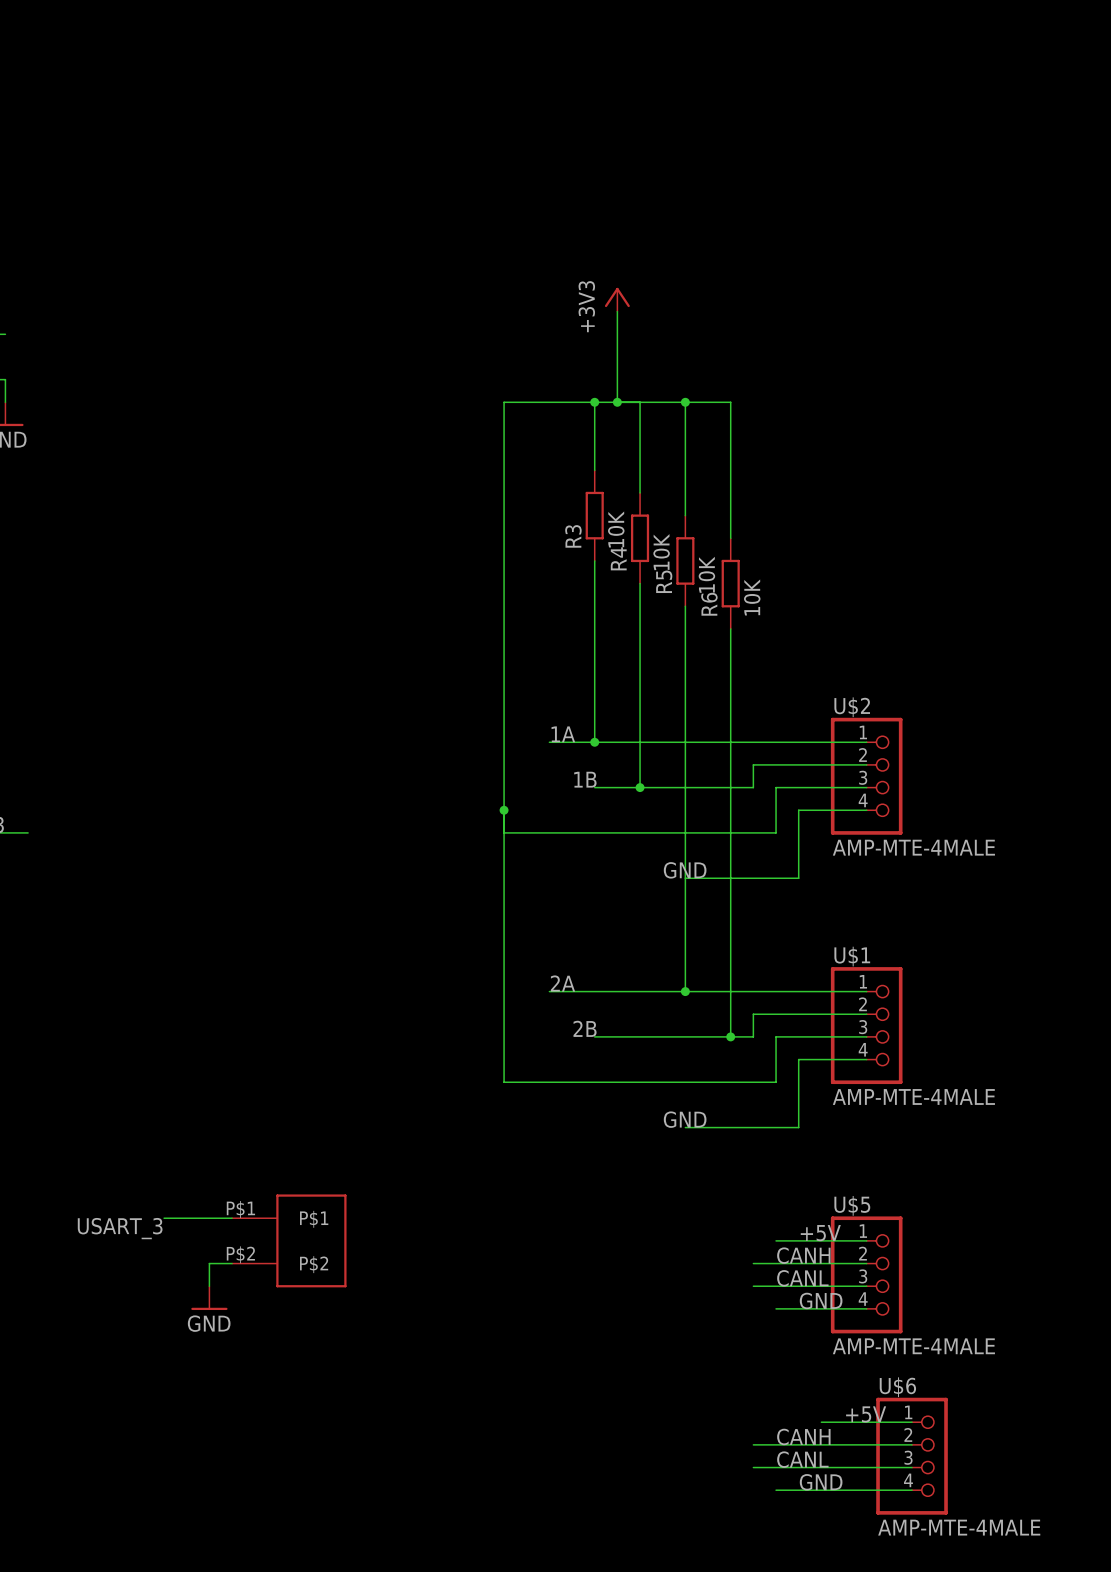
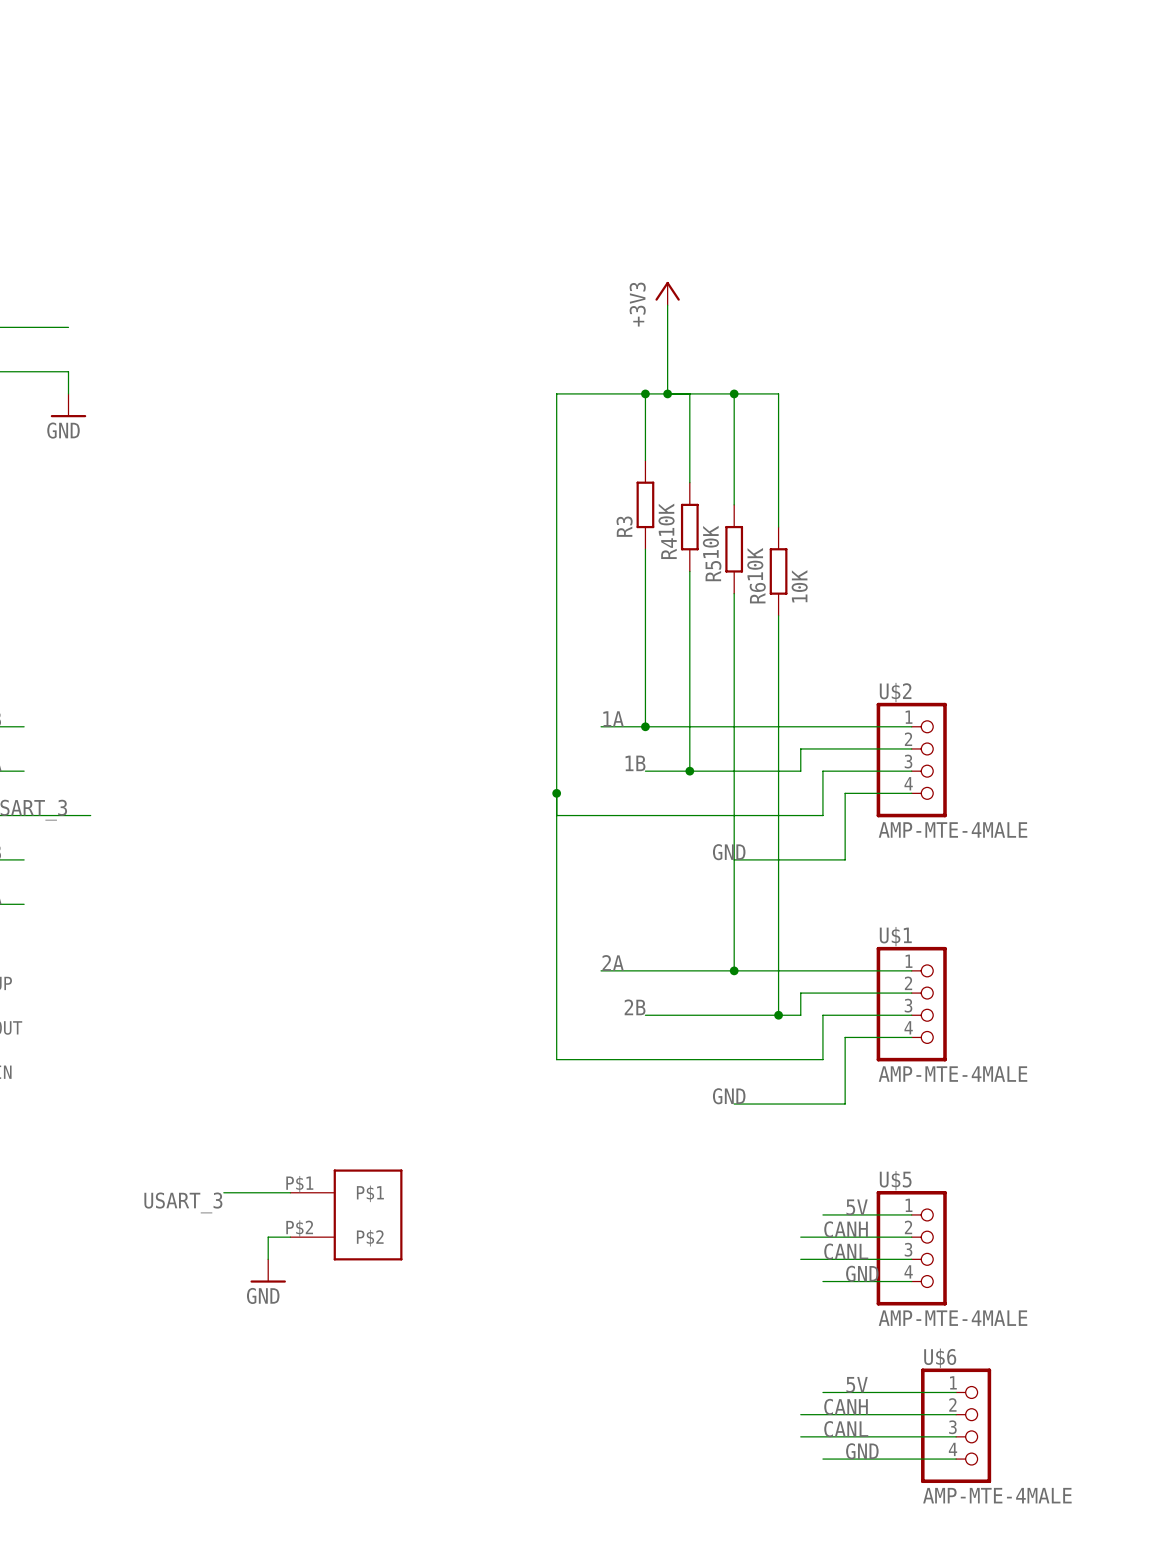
label: +5V (820, 1233) -> 5V (857, 1207)
label: none -> 5V (857, 1384)
label: +5V (866, 1414) -> none
wire: none -> (822, 1392) (867, 1392)

